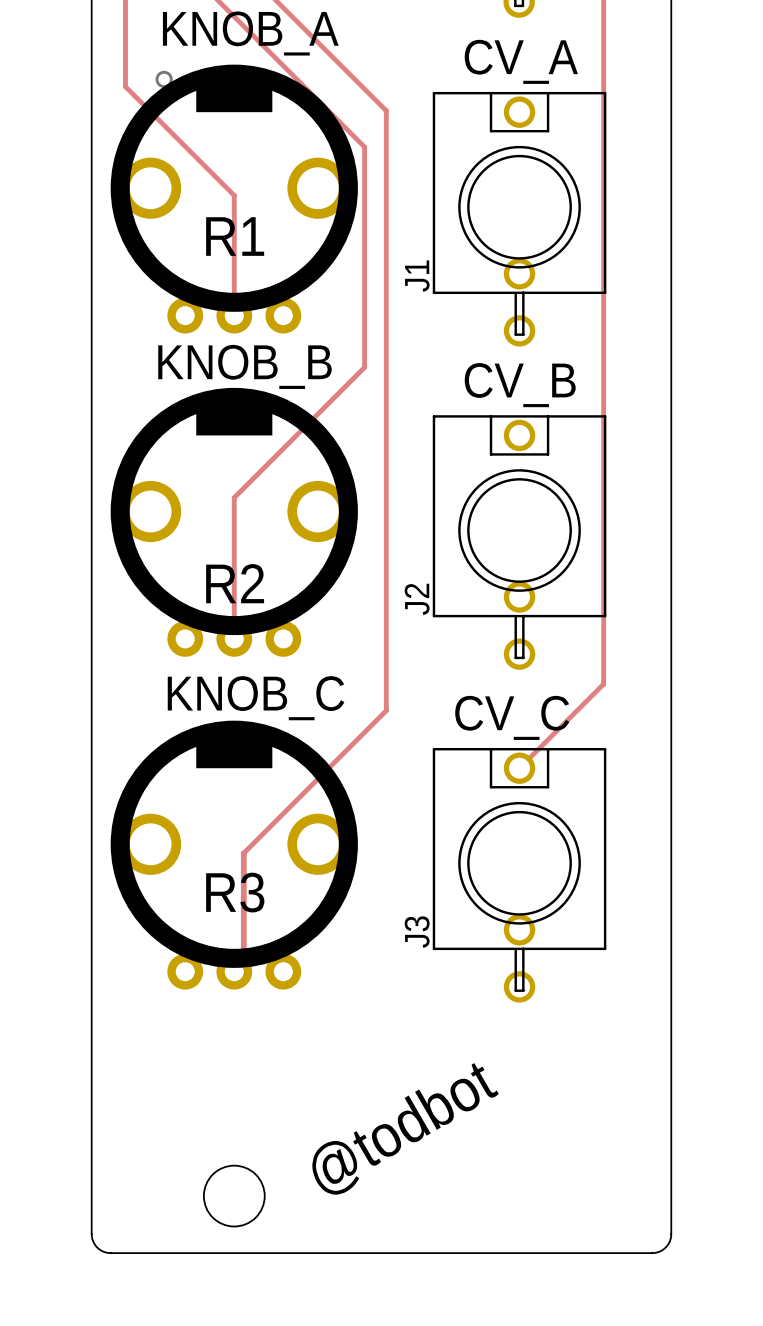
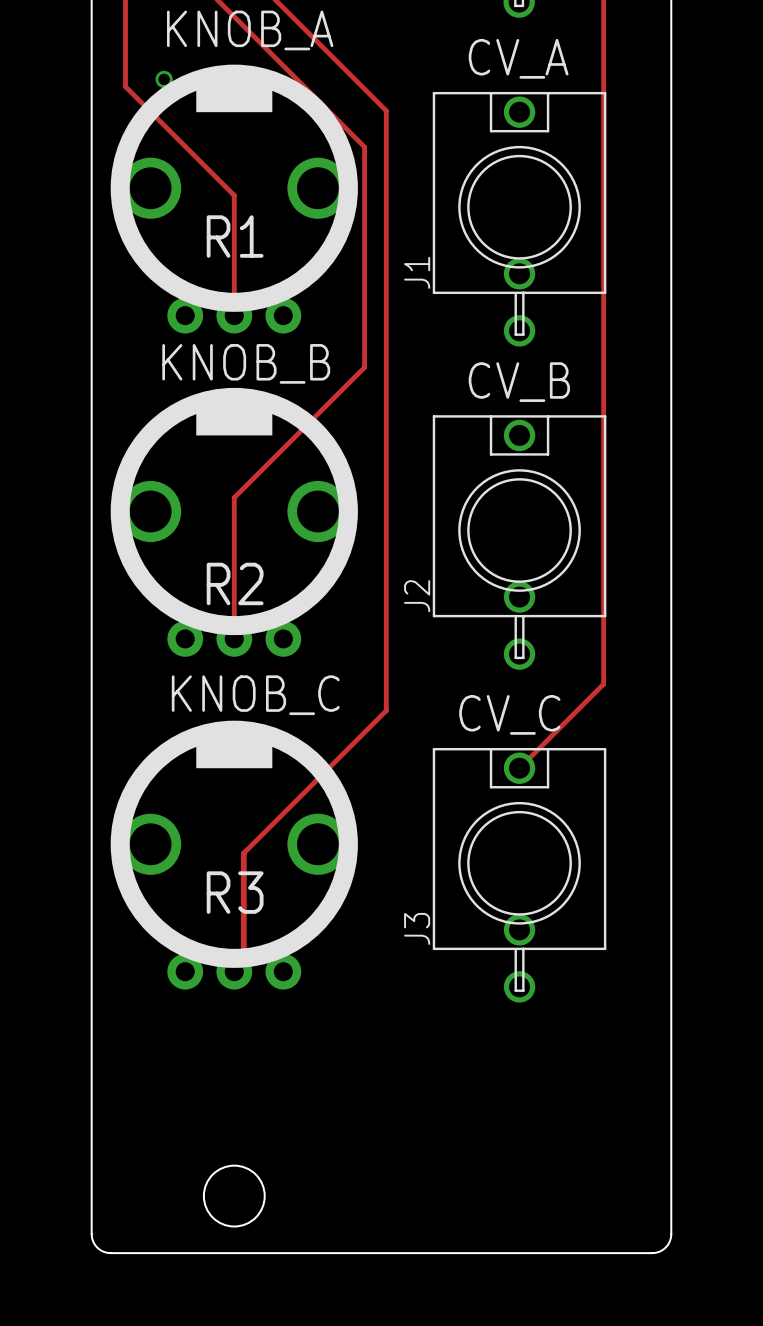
text: @todbot (405, 1128) -> none

